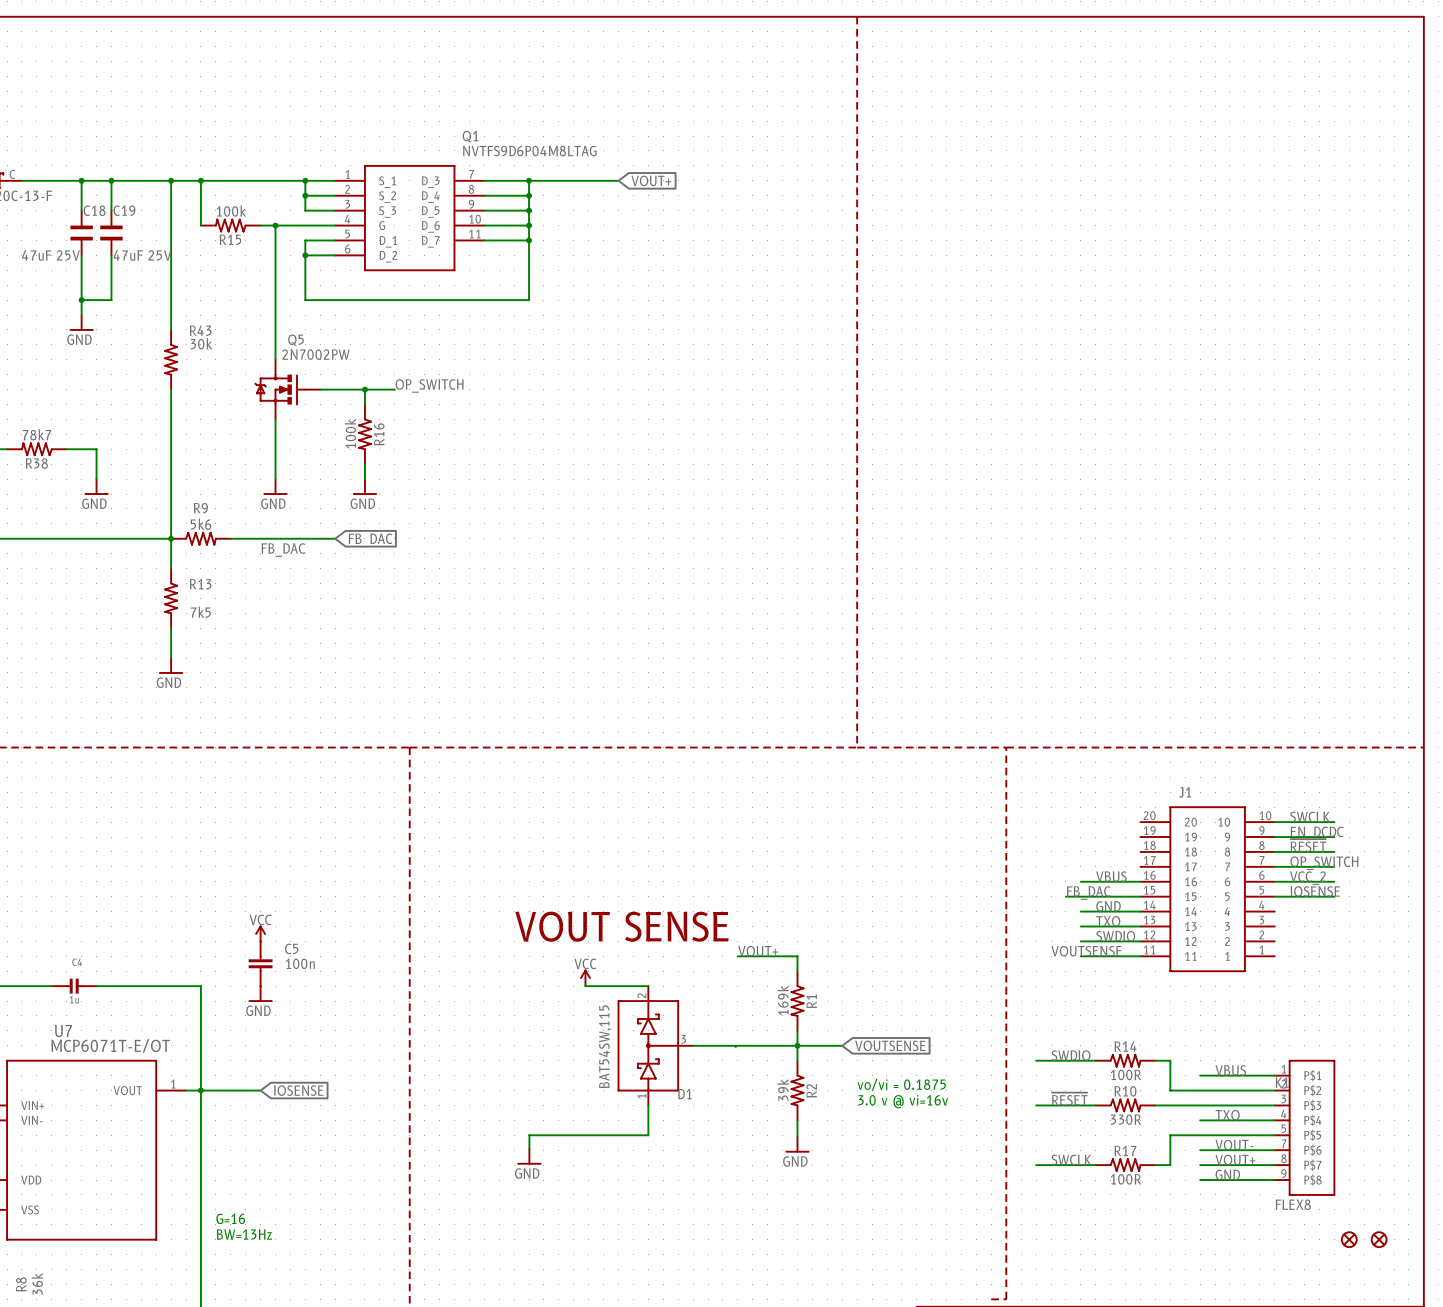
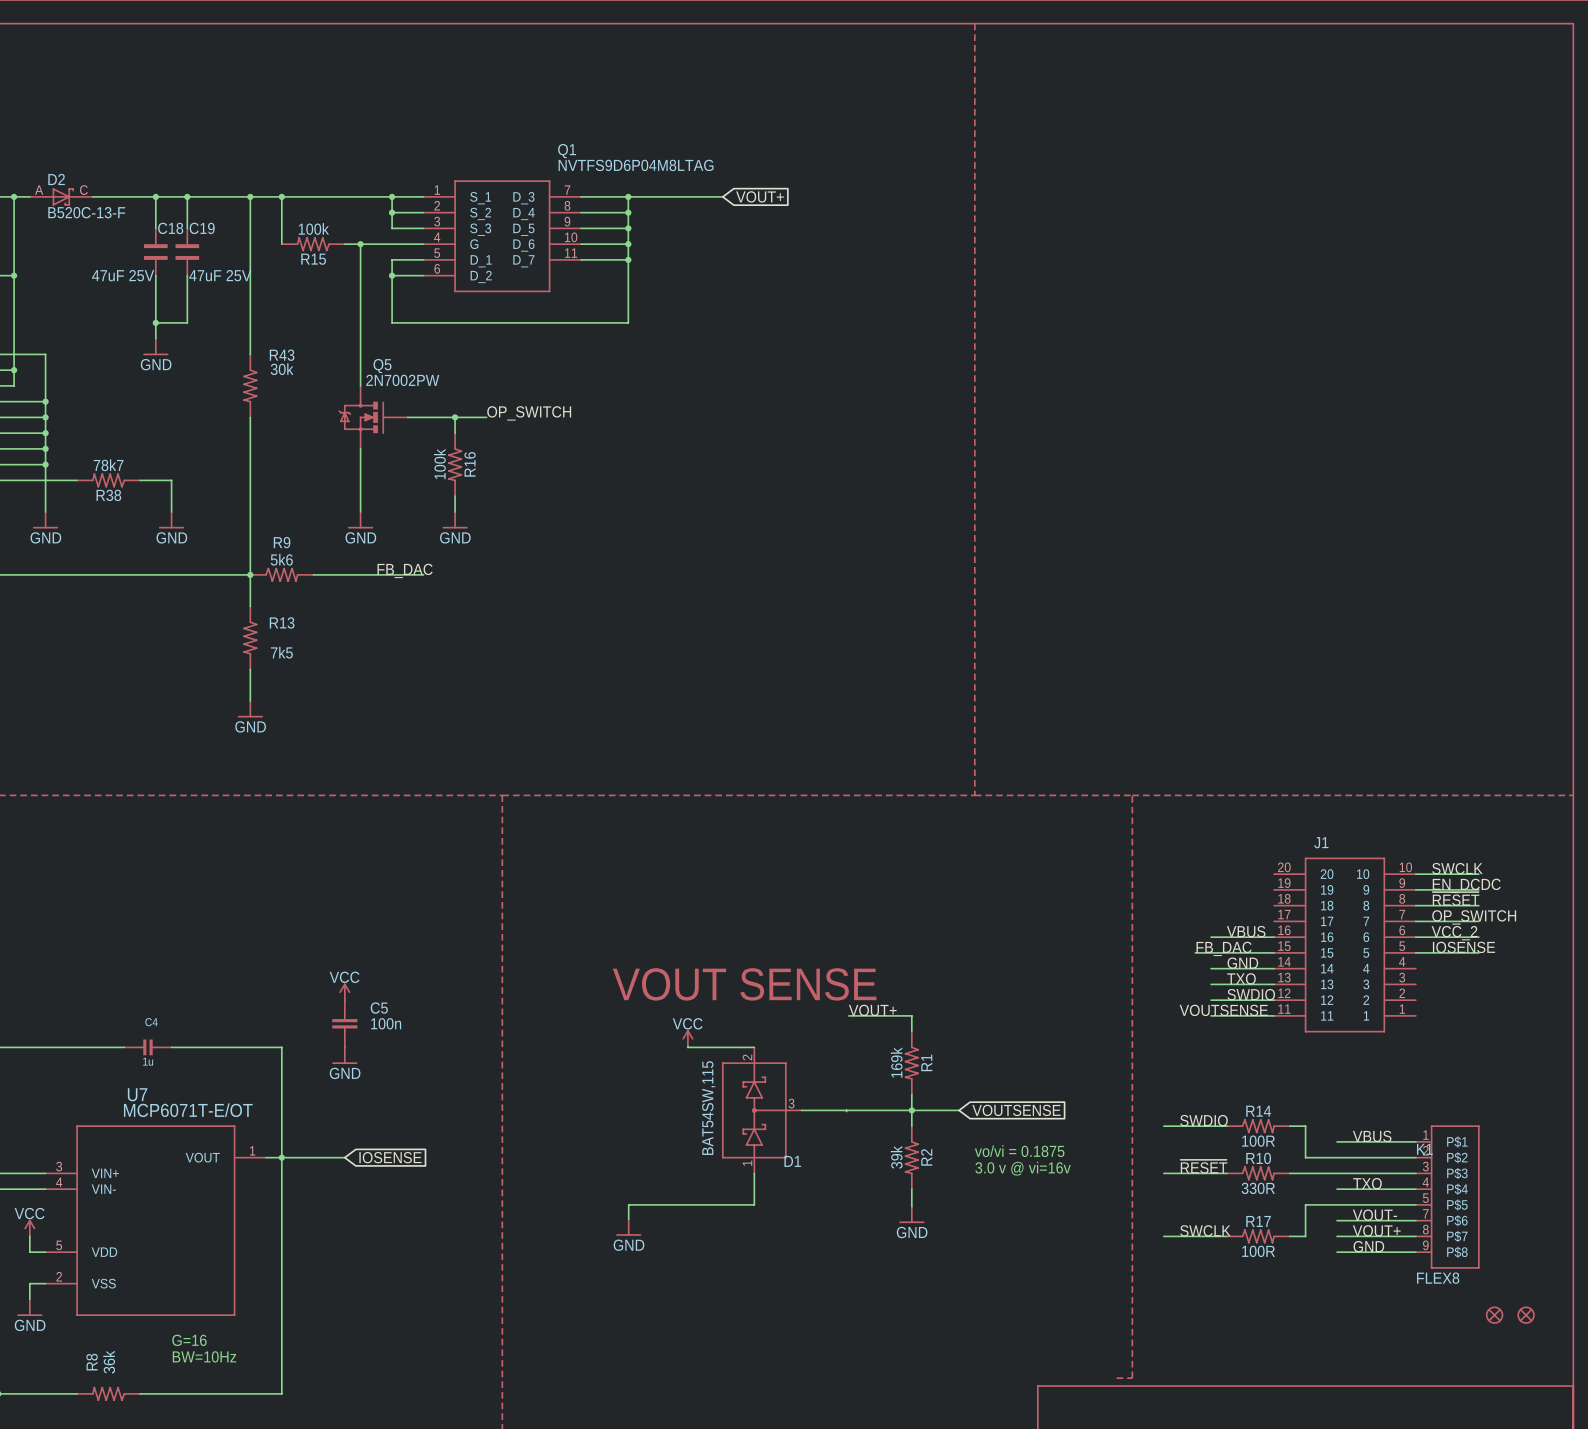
global label: FB_DAC (370, 540) -> none
label position: FB_DAC (283, 550) -> FB_DAC (405, 570)
text position: G=16 (230, 1218) -> G=16 (189, 1340)
text: BW=13Hz (244, 1234) -> none
text: none -> BW=10Hz (204, 1356)

